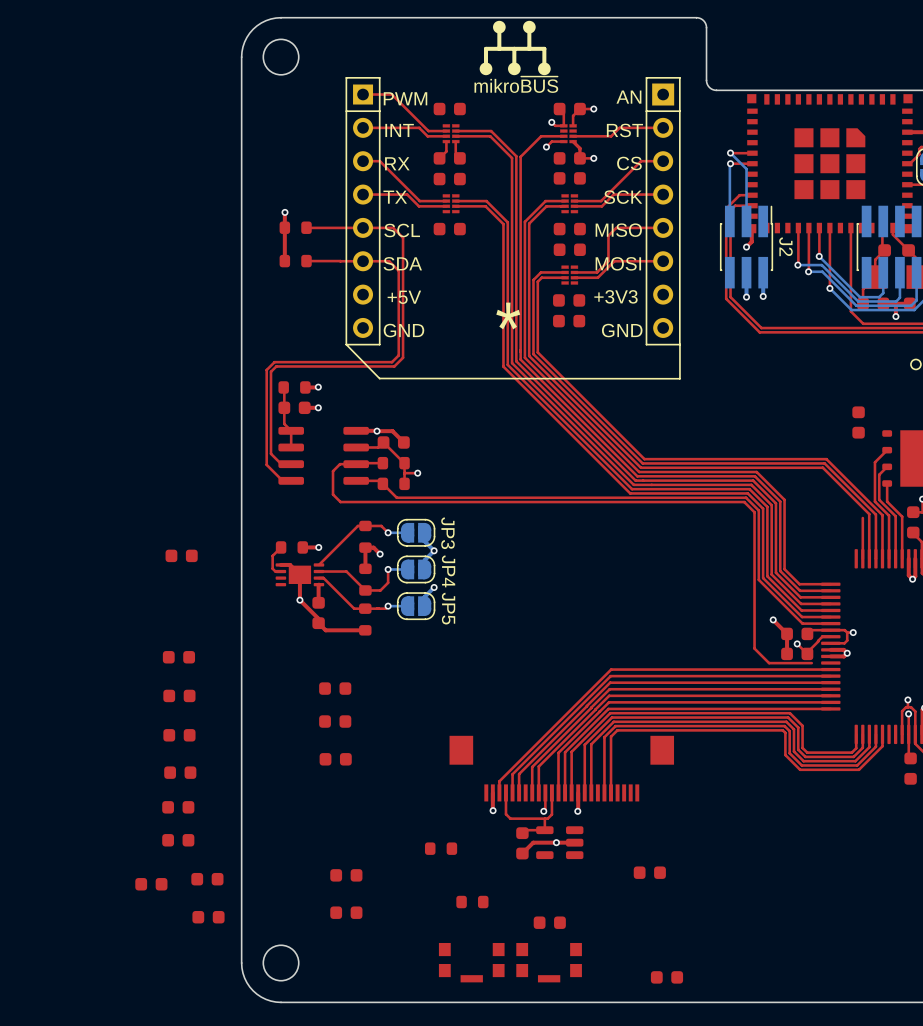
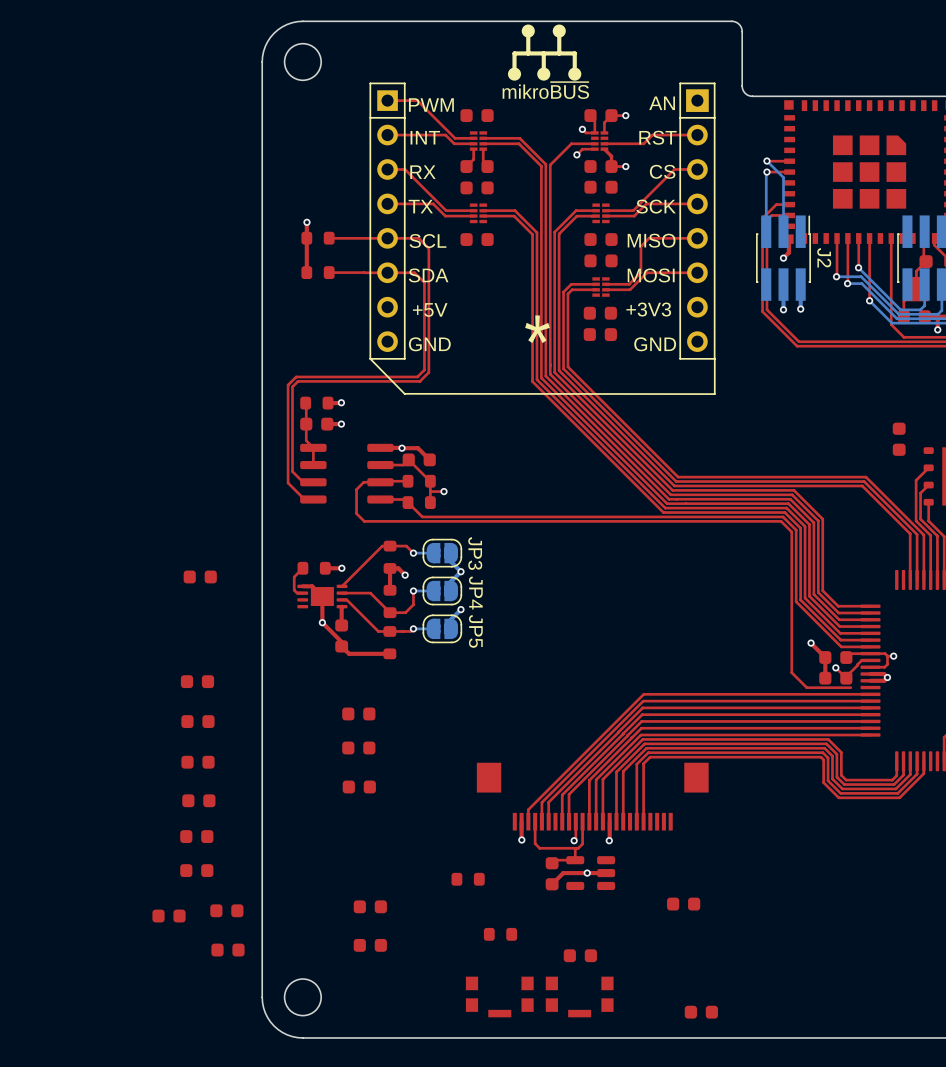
top track: (862, 518) (862, 558) -> none

